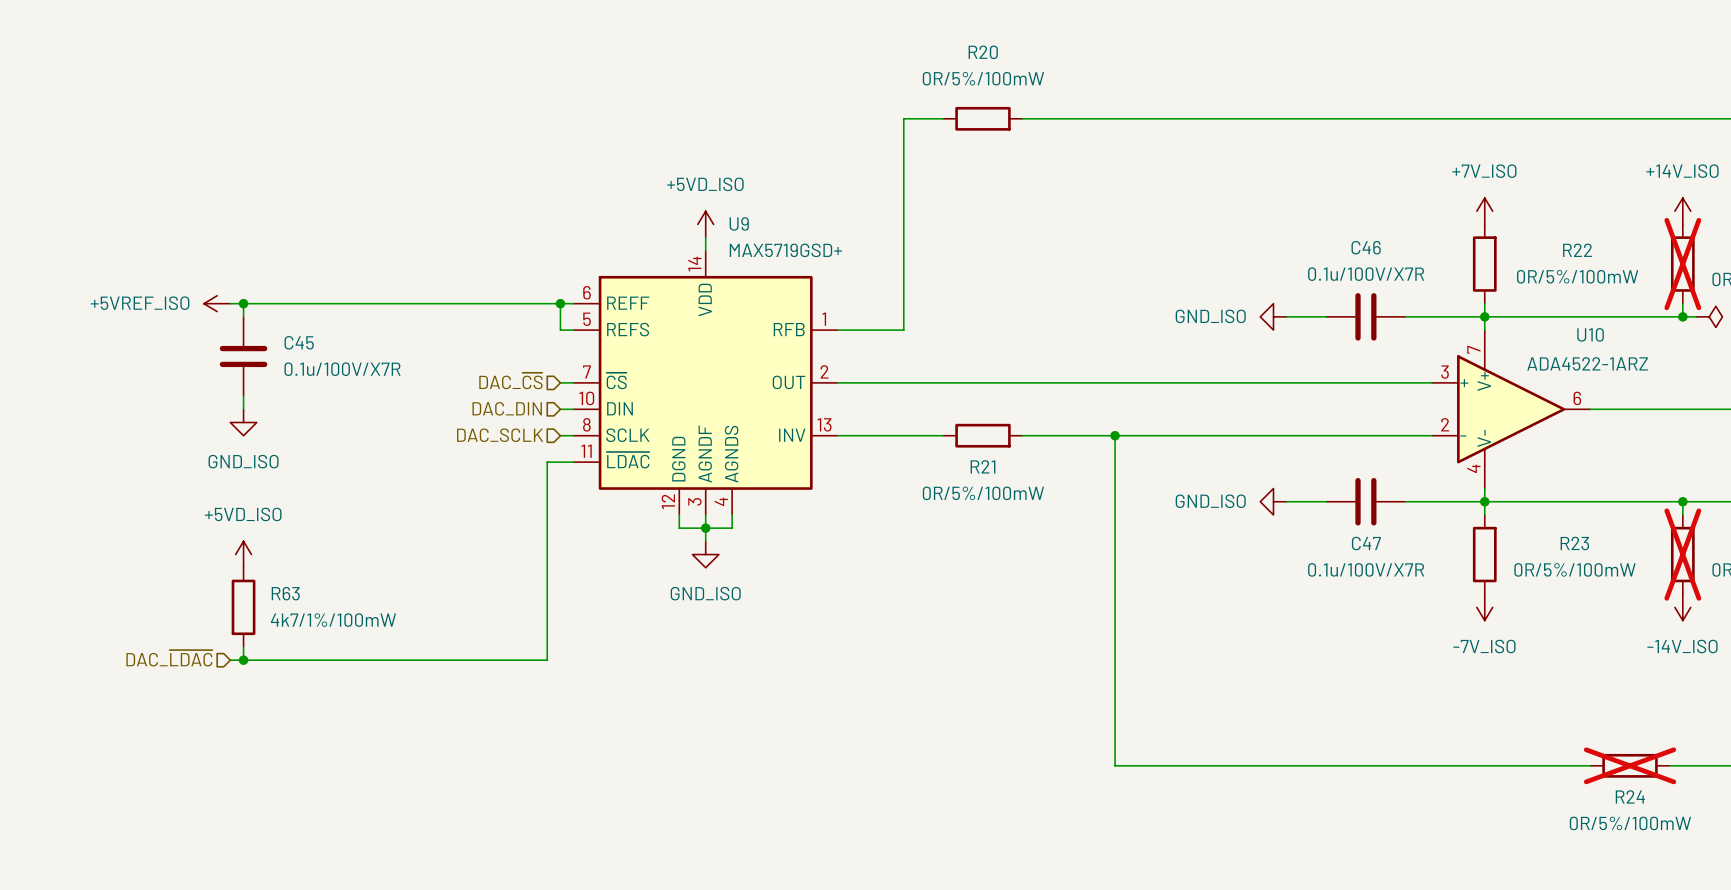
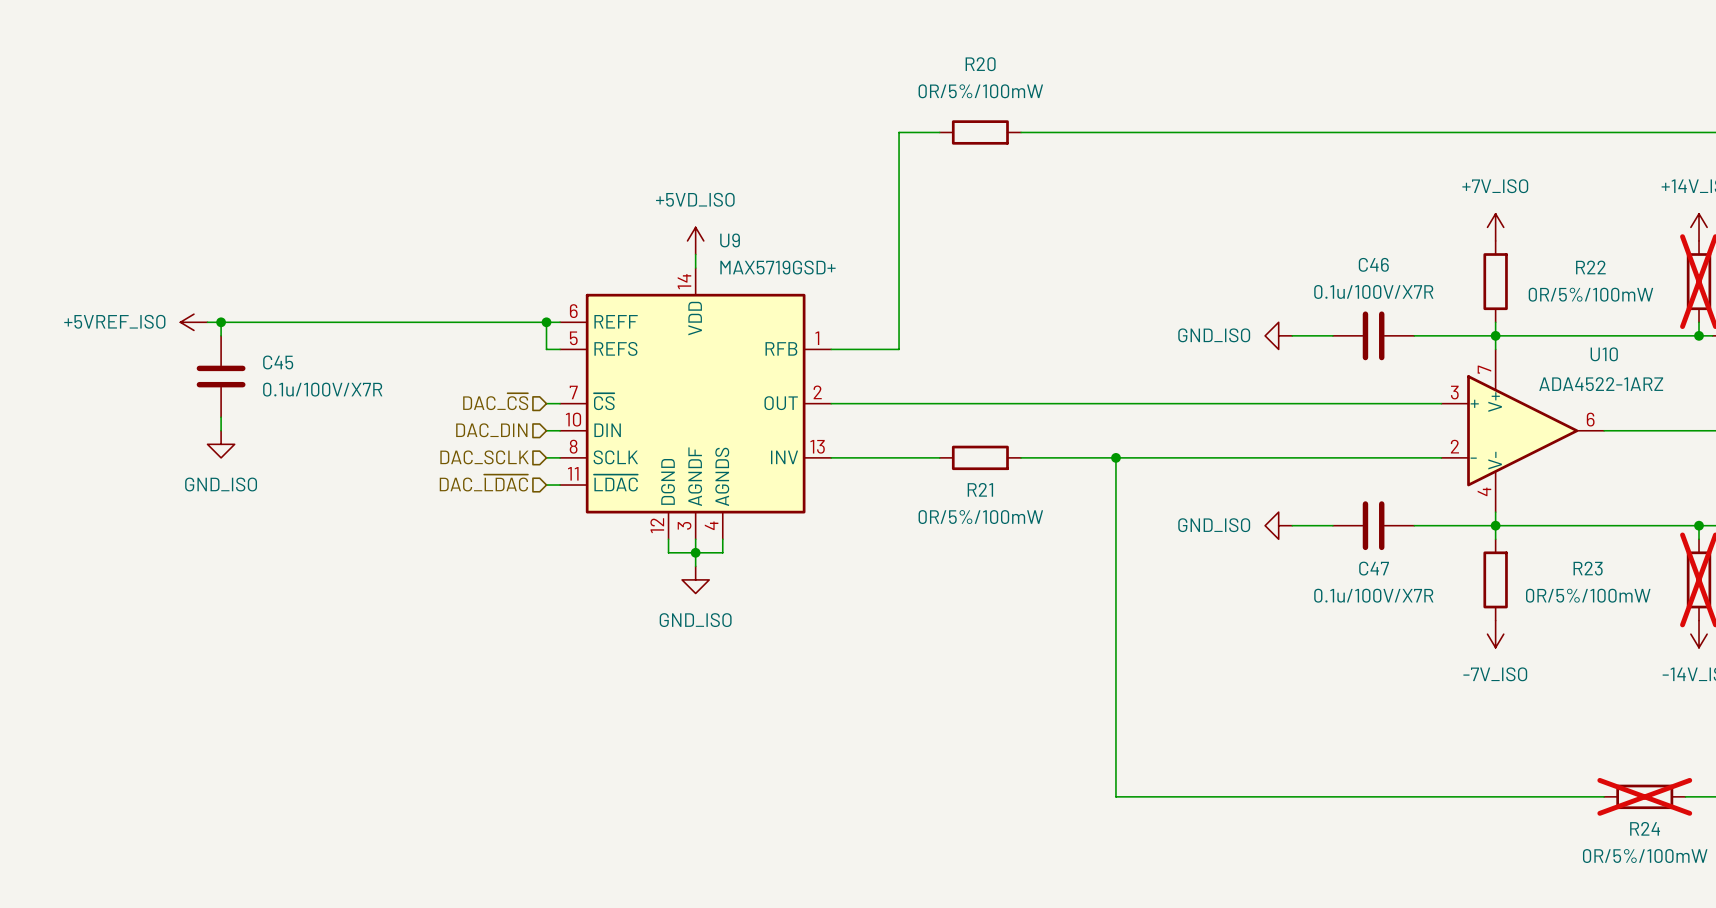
hierarchical label: none -> DAC_~{LDAC} (483, 483)
wire: (560, 462) (547, 462) (547, 660) (230, 660) -> none
power symbol: +5VD_ISO (243, 554) -> none
R63: 4k7/1%/100mW (243, 607) -> none
wire: (243, 646) (243, 660) -> none
hierarchical label: DAC_~{LDAC} (169, 658) -> none
junction: (243, 660) -> none

